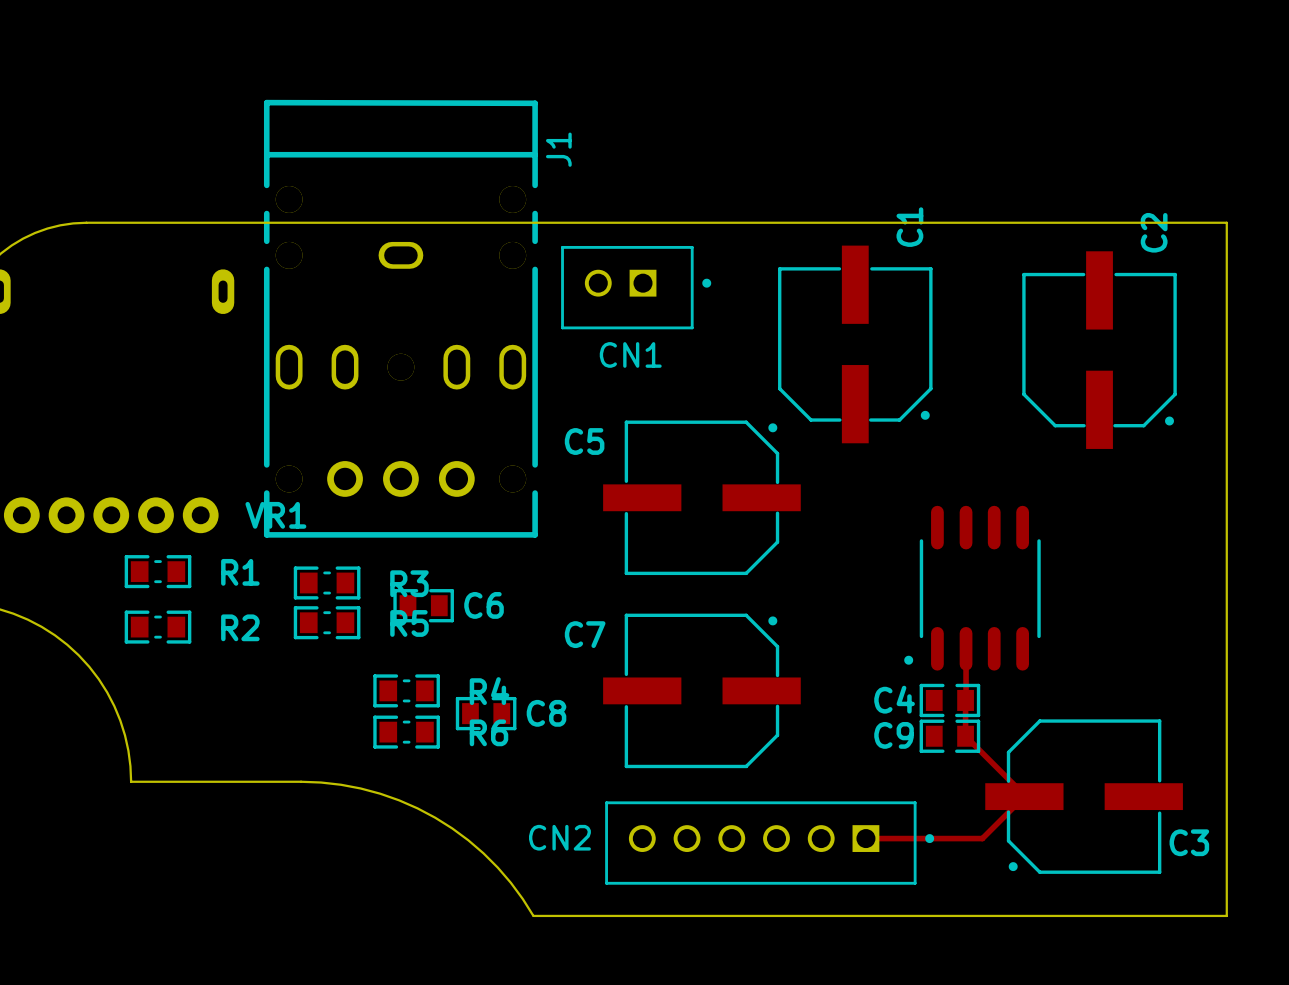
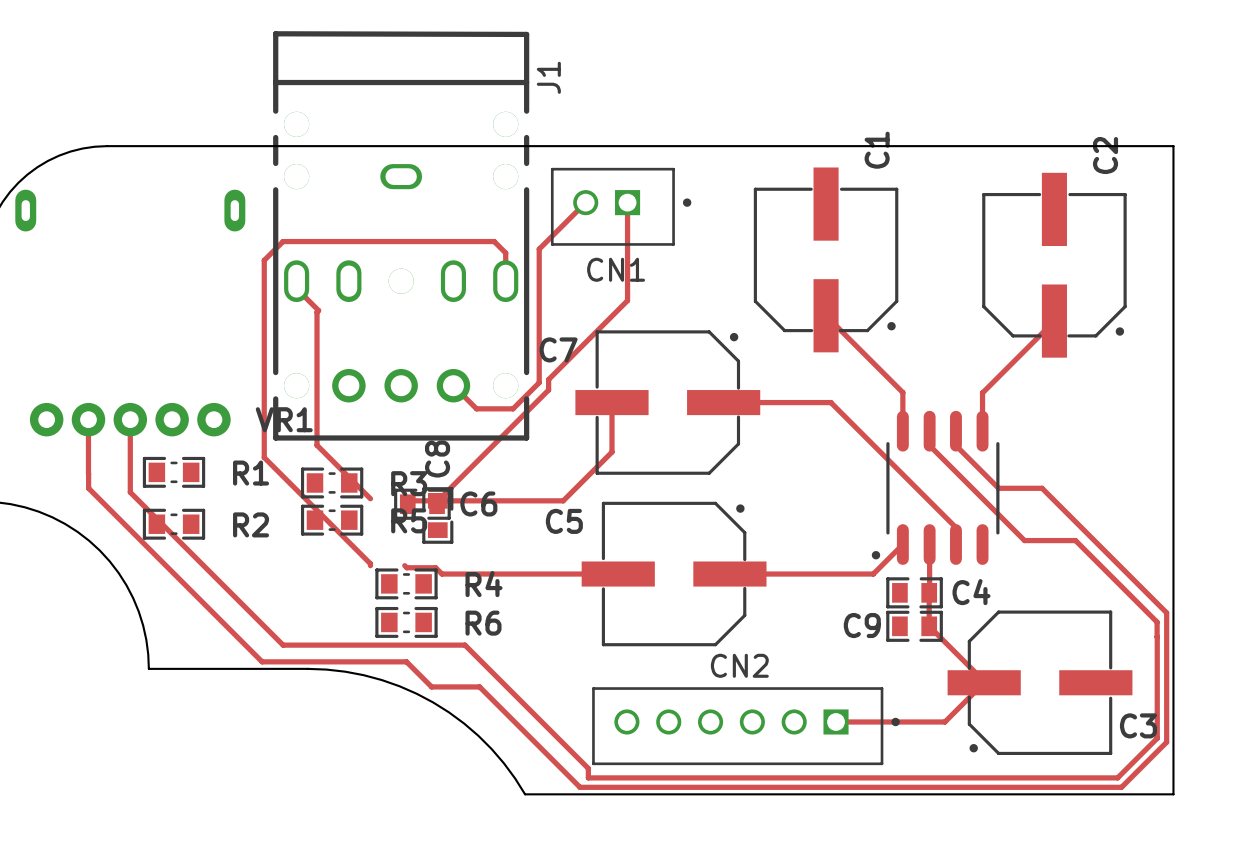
top track: none -> (585, 202) (539, 249) (539, 382) (513, 408) (476, 408) (453, 385)
top track: none -> (627, 202) (627, 300) (548, 379) (548, 390) (437, 500)
top track: none -> (296, 281) (296, 288) (318, 310) (317, 312) (317, 445) (370, 498)
top track: none -> (505, 281) (505, 253) (494, 241) (283, 241) (264, 260) (264, 457) (370, 565)
top track: none -> (826, 315) (902, 392) (902, 431)
top track: none -> (1054, 321) (982, 392) (982, 431)
top track: none -> (611, 402) (611, 452) (563, 500) (406, 500) (404, 498)
top track: none -> (723, 402) (830, 402) (955, 527) (955, 544)
C5 position: (701, 497) -> (674, 574)
top track: none -> (88, 419) (88, 473)
top track: none -> (130, 419) (130, 492) (283, 645) (464, 645) (588, 768) (588, 777) (1117, 777) (1157, 738) (1157, 636)
top track: none -> (929, 431) (929, 445) (1024, 540) (1075, 540) (1157, 622) (1157, 636)
top track: none -> (955, 431) (955, 445) (998, 488) (1042, 488) (1166, 612) (1166, 742) (1121, 787) (579, 787) (479, 686) (431, 686) (406, 661) (262, 661) (88, 488) (88, 473)
top track: none -> (902, 544) (873, 574) (729, 574)
top track: none -> (404, 565) (406, 567) (435, 567) (441, 574) (618, 574)
C7 position: (701, 690) -> (667, 402)
C4 name position: C4 (894, 699) -> C4 (971, 592)
C8 rotation: 0° (486, 713) -> 90° clockwise (437, 515)
C8 position: (486, 713) -> (437, 515)
C8 name position: C8 (546, 713) -> C8 (437, 459)
CN2 name position: CN2 (559, 837) -> CN2 (739, 665)

